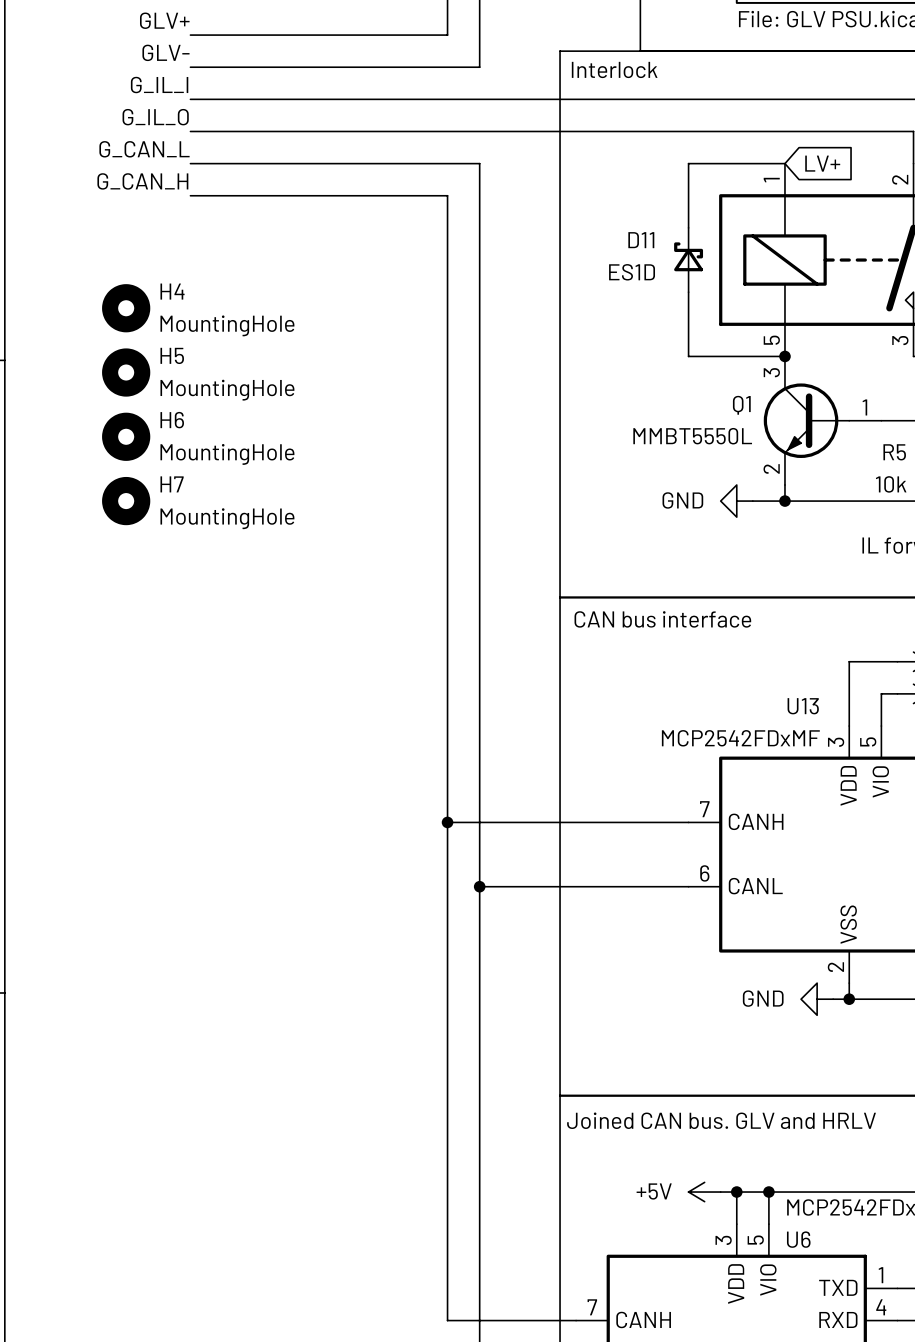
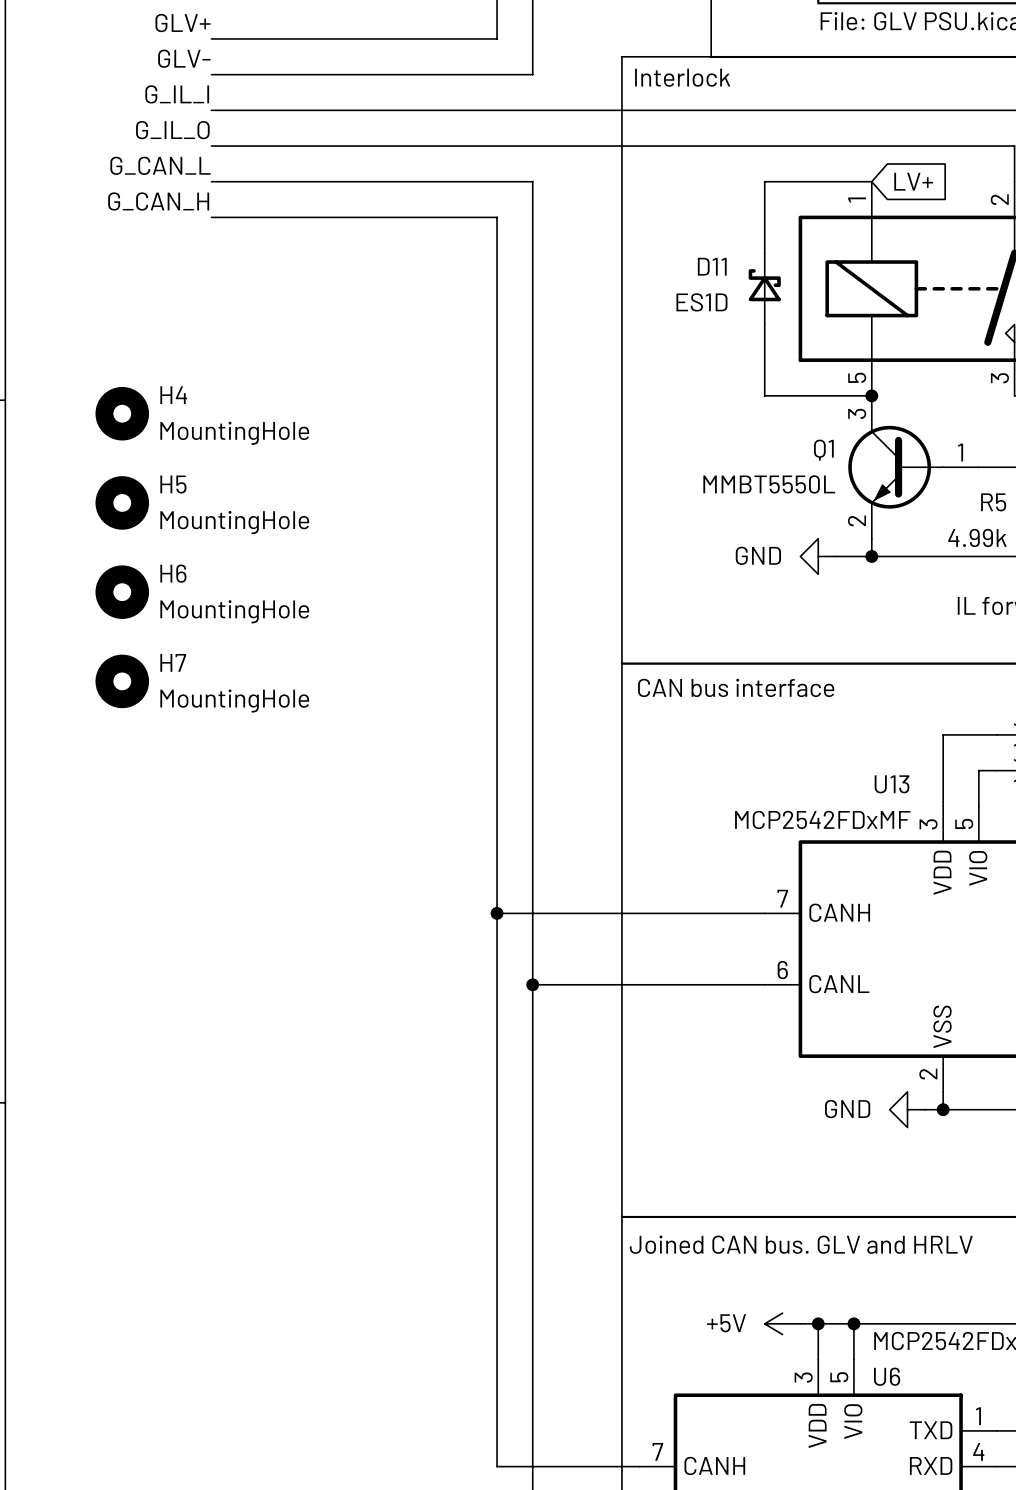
H4 position: (126, 308) -> (122, 413)
H5 position: (126, 372) -> (122, 502)
H6 position: (126, 436) -> (122, 592)
R5 value: 10k (891, 484) -> 4.99k (977, 537)
H7 position: (126, 501) -> (122, 681)

